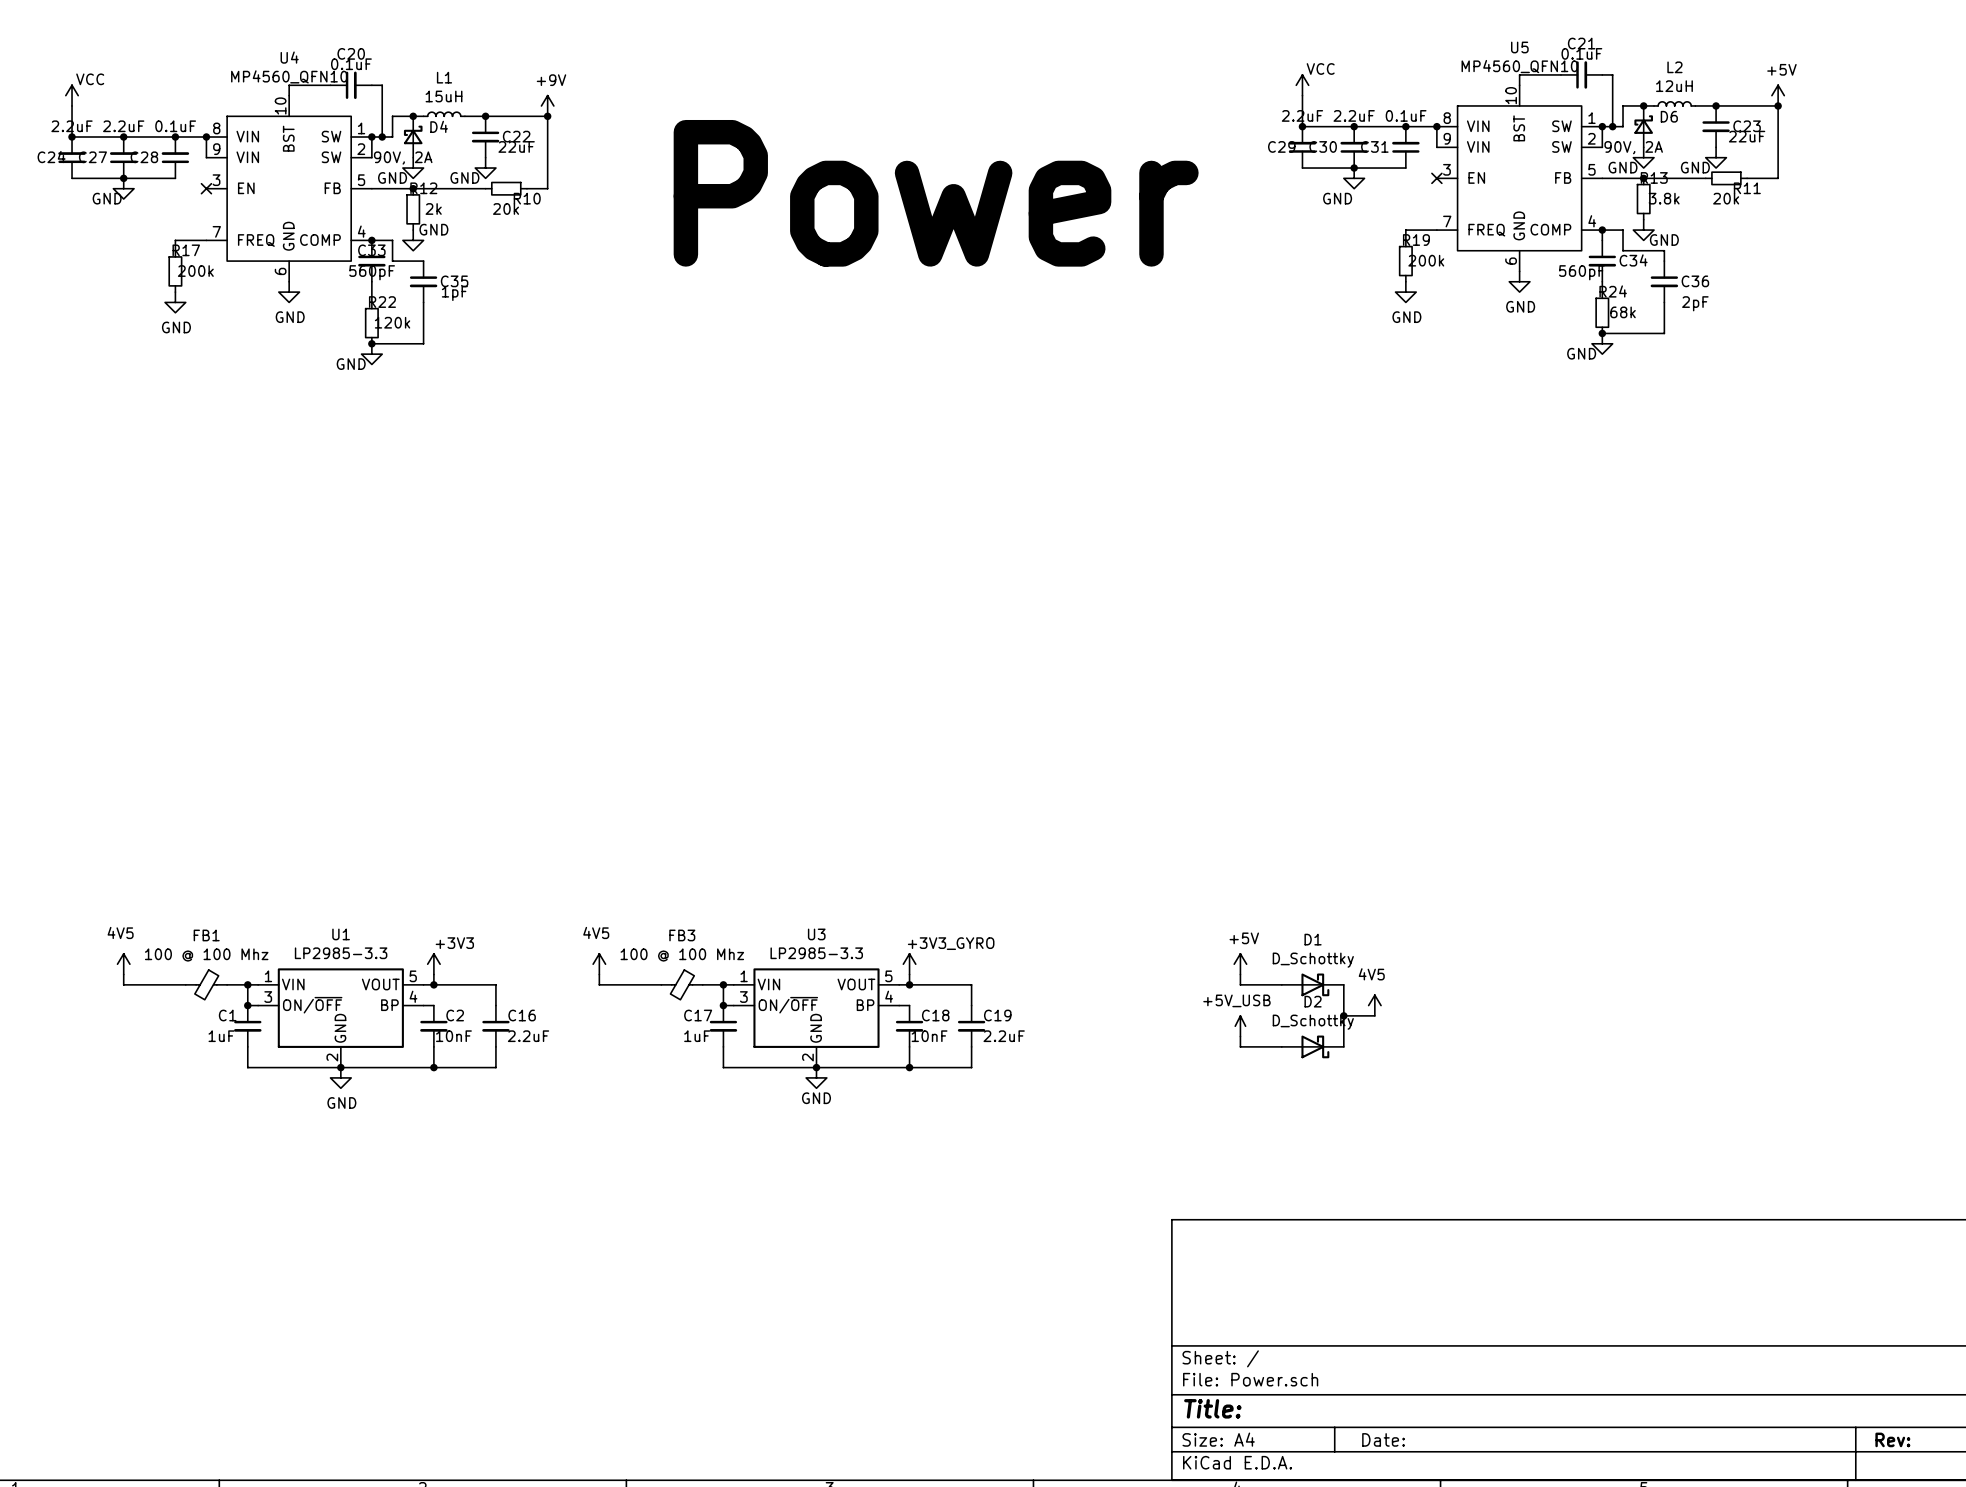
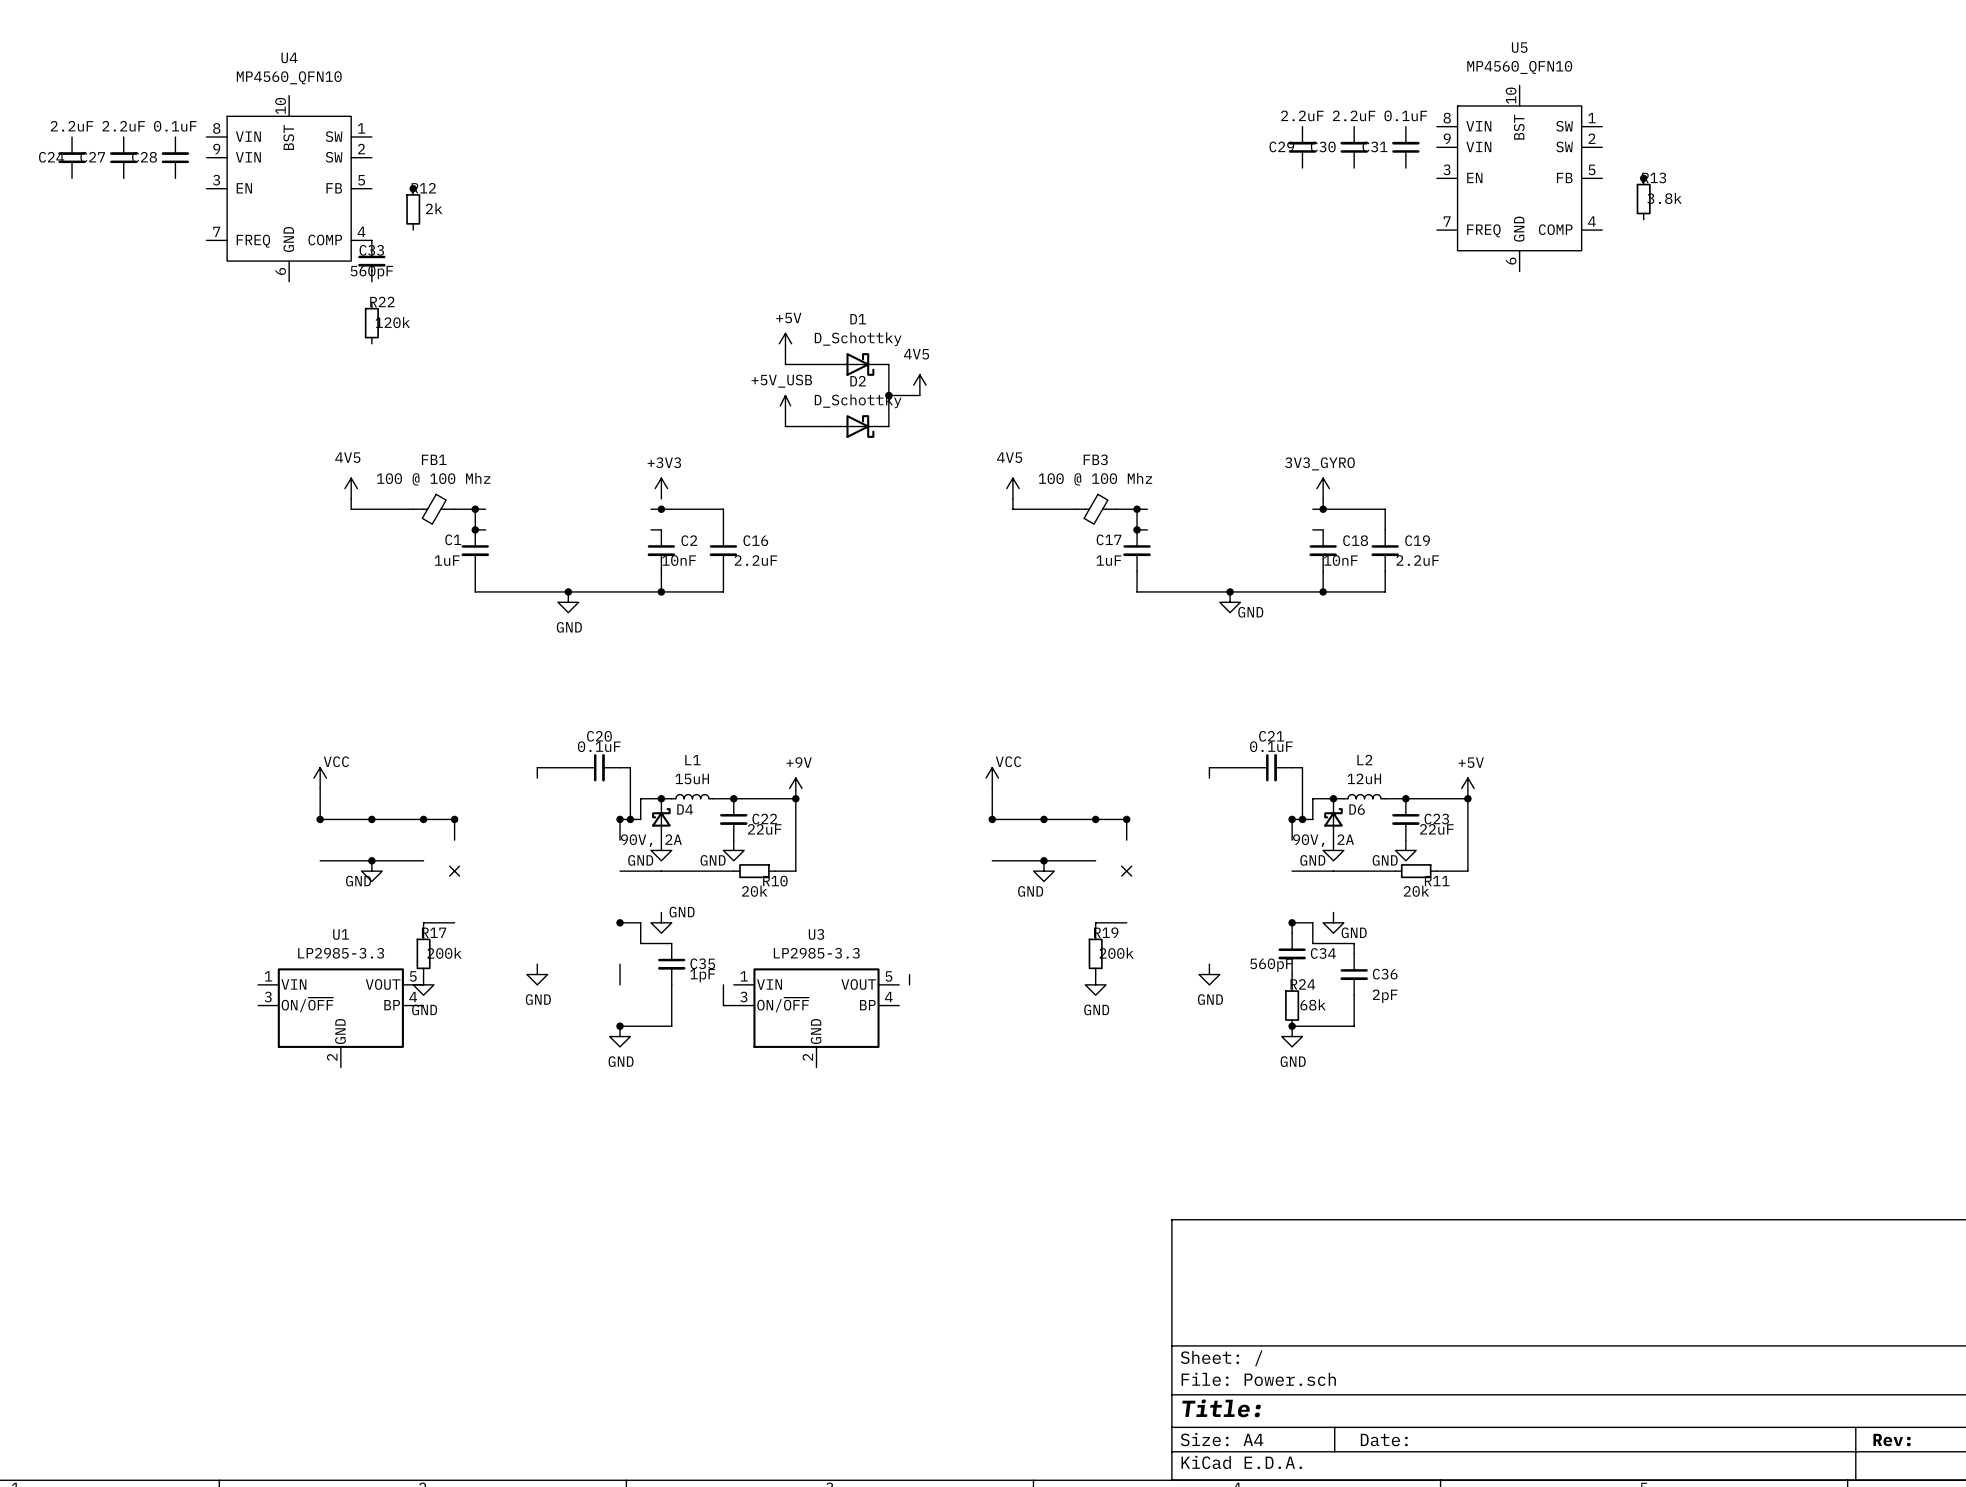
wire: (1560, 74) (1519, 74) (1519, 85) -> none
C21 position: (1581, 74) -> (1271, 767)
wire: (1602, 74) (1612, 74) (1612, 126) -> none
wire: (330, 85) (289, 85) (289, 95) -> none
C20 position: (351, 85) -> (599, 767)
wire: (371, 85) (382, 85) (382, 137) -> none
power symbol: VCC (1302, 85) -> none
power symbol: VCC (72, 95) -> none
wire: (1302, 95) (1302, 126) (1436, 126) (1436, 147) -> none
power symbol: +5V (1778, 95) -> none
L2 position: (1674, 103) -> (1364, 796)
wire: (72, 105) (72, 137) (206, 137) (206, 157) -> none
power symbol: +9V (547, 105) -> none
junction: (1643, 105) -> none
wire: (1654, 105) (1623, 105) (1623, 126) (1602, 126) (1602, 147) -> none
wire: (1695, 105) (1778, 105) (1778, 178) (1747, 178) -> none
junction: (1716, 105) -> none
junction: (1778, 105) -> none
L1 position: (444, 114) -> (692, 796)
junction: (413, 116) -> none
wire: (423, 116) (392, 116) (392, 137) (371, 137) (371, 157) -> none
wire: (464, 116) (547, 116) (547, 188) (526, 188) -> none
junction: (485, 116) -> none
junction: (547, 116) -> none
junction: (1302, 126) -> none
junction: (1354, 126) -> none
junction: (1405, 126) -> none
junction: (1436, 126) -> none
junction: (1602, 126) -> none
junction: (1612, 126) -> none
D6 position: (1643, 126) -> (1333, 819)
C23 position: (1716, 126) -> (1405, 819)
junction: (72, 137) -> none
junction: (123, 137) -> none
junction: (175, 137) -> none
junction: (206, 137) -> none
junction: (371, 137) -> none
junction: (382, 137) -> none
D4 position: (413, 137) -> (661, 819)
C22 position: (485, 137) -> (733, 819)
power symbol: GND (1643, 157) -> none
power symbol: GND (1716, 157) -> none
power symbol: GND (413, 168) -> none
power symbol: GND (485, 168) -> none
wire: (1302, 168) (1405, 168) -> none
junction: (1354, 168) -> none
wire: (72, 178) (175, 178) -> none
junction: (123, 178) -> none
power symbol: GND (1354, 178) -> none
no-connect mark: (1436, 178) -> none
wire: (1602, 178) (1705, 178) -> none
R11 position: (1726, 178) -> (1416, 871)
power symbol: GND (123, 188) -> none
no-connect mark: (206, 188) -> none
wire: (371, 188) (485, 188) -> none
R10 position: (506, 188) -> (754, 871)
text: Power (936, 193) -> none
wire: (1436, 230) (1405, 230) (1405, 240) -> none
junction: (1602, 230) -> none
power symbol: GND (1643, 230) -> none
wire: (206, 240) (175, 240) (175, 250) -> none
wire: (371, 240) (392, 240) (392, 261) (423, 261) -> none
junction: (371, 240) -> none
power symbol: GND (413, 240) -> none
wire: (1602, 240) (1602, 230) (1623, 230) (1623, 250) (1664, 250) (1664, 261) -> none
R19 position: (1405, 261) -> (1095, 953)
C34 position: (1602, 261) -> (1292, 953)
R17 position: (175, 271) -> (423, 953)
wire: (371, 281) (371, 302) -> none
C35 position: (423, 281) -> (671, 964)
power symbol: GND (1519, 281) -> none
wire: (1602, 281) (1602, 292) -> none
C36 position: (1664, 281) -> (1354, 974)
power symbol: GND (289, 292) -> none
power symbol: GND (1405, 292) -> none
power symbol: GND (175, 302) -> none
wire: (423, 302) (423, 343) (371, 343) -> none
wire: (1664, 302) (1664, 333) (1602, 333) -> none
R24 position: (1602, 312) -> (1292, 1005)
junction: (1602, 333) -> none
junction: (371, 343) -> none
power symbol: none -> +5V (785, 343)
power symbol: GND (1602, 343) -> none
power symbol: GND (371, 354) -> none
wire: none -> (785, 354) (785, 364) (826, 364)
wire: none -> (888, 364) (888, 426)
power symbol: none -> 4V5 (919, 385)
wire: none -> (888, 395) (919, 395)
junction: none -> (888, 395)
power symbol: none -> +5V_USB (785, 405)
wire: none -> (785, 416) (785, 426) (826, 426)
power symbol: none -> 4V5 (351, 488)
power symbol: none -> +3V3 (661, 488)
power symbol: none -> 4V5 (1012, 488)
power symbol: none -> 3V3_GYRO (1323, 488)
wire: none -> (351, 498) (351, 509) (413, 509)
wire: none -> (1012, 498) (1012, 509) (1074, 509)
wire: none -> (1323, 498) (1323, 509)
wire: none -> (454, 509) (485, 509)
wire: none -> (475, 509) (475, 529) (485, 529)
junction: none -> (475, 509)
wire: none -> (651, 509) (723, 509) (723, 529)
junction: none -> (661, 509)
wire: none -> (1116, 509) (1147, 509)
wire: none -> (1137, 509) (1137, 529) (1147, 529)
junction: none -> (1137, 509)
wire: none -> (1312, 509) (1385, 509) (1385, 529)
junction: none -> (1323, 509)
junction: none -> (475, 529)
wire: none -> (651, 529) (661, 529)
junction: none -> (1137, 529)
wire: none -> (1312, 529) (1323, 529)
wire: none -> (475, 571) (475, 591) (723, 591) (723, 571)
wire: none -> (661, 571) (661, 591)
wire: none -> (1137, 571) (1137, 591) (1385, 591) (1385, 571)
wire: none -> (1323, 571) (1323, 591)
junction: none -> (568, 591)
junction: none -> (661, 591)
junction: none -> (1230, 591)
junction: none -> (1323, 591)
power symbol: none -> GND (568, 602)
power symbol: none -> GND (1230, 602)
wire: none -> (578, 767) (537, 767) (537, 778)
wire: none -> (620, 767) (630, 767) (630, 819)
wire: none -> (1250, 767) (1209, 767) (1209, 778)
wire: none -> (1292, 767) (1302, 767) (1302, 819)
power symbol: none -> VCC (320, 778)
power symbol: none -> VCC (992, 778)
wire: none -> (320, 788) (320, 819) (454, 819) (454, 840)
power symbol: none -> +9V (795, 788)
wire: none -> (992, 788) (992, 819) (1126, 819) (1126, 840)
power symbol: none -> +5V (1467, 788)
junction: none -> (661, 798)
wire: none -> (671, 798) (640, 798) (640, 819) (620, 819) (620, 840)
wire: none -> (713, 798) (795, 798) (795, 871) (775, 871)
junction: none -> (733, 798)
junction: none -> (795, 798)
junction: none -> (1333, 798)
wire: none -> (1343, 798) (1312, 798) (1312, 819) (1292, 819) (1292, 840)
wire: none -> (1385, 798) (1467, 798) (1467, 871) (1436, 871)
junction: none -> (1405, 798)
junction: none -> (1467, 798)
junction: none -> (320, 819)
junction: none -> (371, 819)
junction: none -> (423, 819)
junction: none -> (454, 819)
junction: none -> (620, 819)
junction: none -> (630, 819)
junction: none -> (992, 819)
junction: none -> (1043, 819)
junction: none -> (1095, 819)
junction: none -> (1126, 819)
junction: none -> (1292, 819)
junction: none -> (1302, 819)
power symbol: none -> GND (661, 850)
power symbol: none -> GND (733, 850)
power symbol: none -> GND (1333, 850)
power symbol: none -> GND (1405, 850)
wire: none -> (320, 860) (423, 860)
junction: none -> (371, 860)
wire: none -> (992, 860) (1095, 860)
junction: none -> (1043, 860)
power symbol: none -> GND (371, 871)
no-connect mark: none -> (454, 871)
wire: none -> (620, 871) (733, 871)
power symbol: none -> GND (1043, 871)
no-connect mark: none -> (1126, 871)
wire: none -> (1292, 871) (1395, 871)
wire: none -> (454, 922) (423, 922) (423, 933)
wire: none -> (620, 922) (640, 922) (640, 943) (671, 943)
junction: none -> (620, 922)
power symbol: none -> GND (661, 922)
wire: none -> (1126, 922) (1095, 922) (1095, 933)
junction: none -> (1292, 922)
power symbol: none -> GND (1333, 922)
wire: none -> (1292, 933) (1292, 922) (1312, 922) (1312, 943) (1354, 943) (1354, 953)
power symbol: 4V5 (123, 964) -> none
power symbol: +3V3 (433, 964) -> none
power symbol: 4V5 (599, 964) -> none
wire: none -> (620, 964) (620, 984)
power symbol: +3V3_GYRO (909, 964) -> none
power symbol: +5V (1240, 964) -> none
wire: (123, 974) (123, 984) (185, 984) -> none
wire: (433, 974) (433, 984) -> none
power symbol: none -> GND (537, 974)
wire: (599, 974) (599, 984) (661, 984) -> none
power symbol: none -> GND (1209, 974)
wire: (1240, 974) (1240, 984) (1281, 984) -> none
wire: none -> (1292, 974) (1292, 984)
FB1 position: (206, 984) -> (433, 509)
wire: (227, 984) (258, 984) -> none
wire: (247, 984) (247, 1005) (258, 1005) -> none
junction: (247, 984) -> none
wire: (423, 984) (495, 984) (495, 1005) -> none
power symbol: none -> GND (423, 984)
junction: (433, 984) -> none
wire: none -> (671, 984) (671, 1026) (620, 1026)
FB3 position: (682, 984) -> (1095, 509)
wire: (702, 984) (733, 984) -> none
junction: (723, 984) -> none
wire: (899, 984) (971, 984) (971, 1005) -> none
junction: (909, 984) -> none
power symbol: none -> GND (1095, 984)
D1 position: (1312, 984) -> (857, 364)
wire: (1343, 984) (1343, 1046) -> none
wire: none -> (1354, 995) (1354, 1026) (1292, 1026)
junction: (247, 1005) -> none
wire: (423, 1005) (433, 1005) -> none
junction: (723, 1005) -> none
wire: (899, 1005) (909, 1005) -> none
power symbol: 4V5 (1374, 1005) -> none
C2 name position: C2 (455, 1015) -> C2 (689, 540)
C16 name position: C16 (522, 1015) -> C16 (755, 540)
C18 name position: C18 (935, 1015) -> C18 (1355, 540)
C19 name position: C19 (997, 1015) -> C19 (1417, 540)
wire: (1343, 1015) (1374, 1015) -> none
junction: (1343, 1015) -> none
C1 position: (247, 1026) -> (475, 550)
C2 position: (433, 1026) -> (661, 550)
C16 position: (495, 1026) -> (723, 550)
junction: none -> (620, 1026)
C17 position: (723, 1026) -> (1137, 550)
C18 position: (909, 1026) -> (1323, 550)
C19 position: (971, 1026) -> (1385, 550)
power symbol: +5V_USB (1240, 1026) -> none
junction: none -> (1292, 1026)
power symbol: none -> GND (620, 1036)
wire: (1240, 1036) (1240, 1046) (1281, 1046) -> none
power symbol: none -> GND (1292, 1036)
wire: (247, 1046) (247, 1067) (495, 1067) (495, 1046) -> none
wire: (433, 1046) (433, 1067) -> none
wire: (723, 1046) (723, 1067) (971, 1067) (971, 1046) -> none
wire: (909, 1046) (909, 1067) -> none
D2 position: (1312, 1046) -> (857, 426)
junction: (340, 1067) -> none
junction: (433, 1067) -> none
junction: (816, 1067) -> none
junction: (909, 1067) -> none
power symbol: GND (340, 1077) -> none
power symbol: GND (816, 1077) -> none

